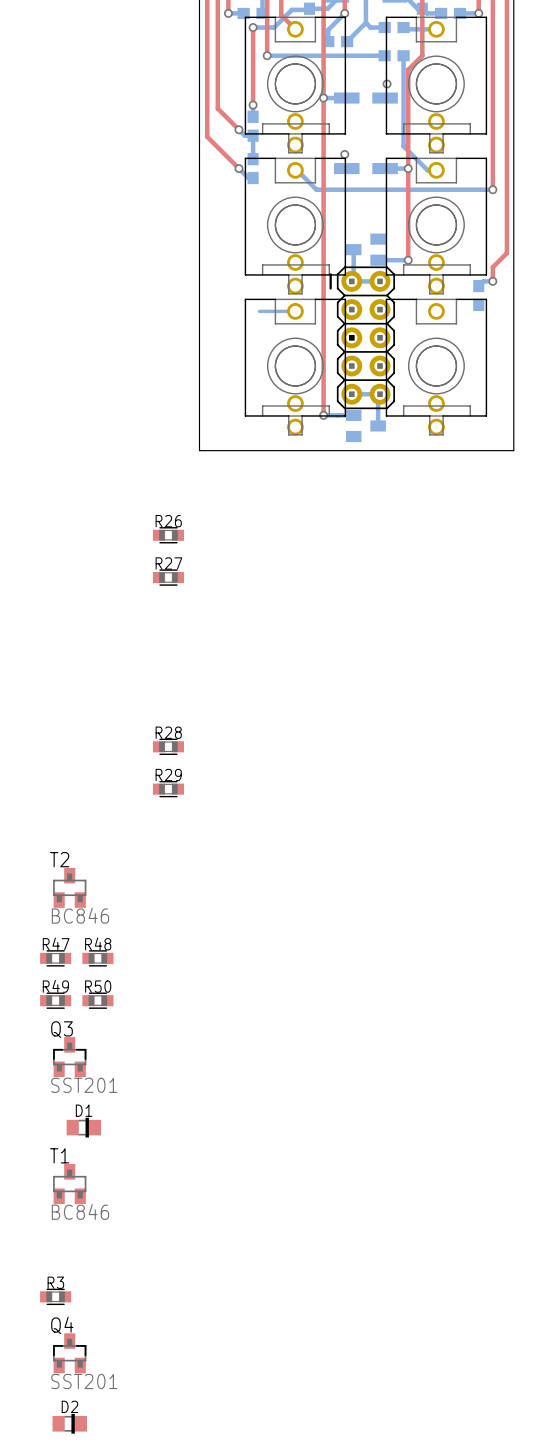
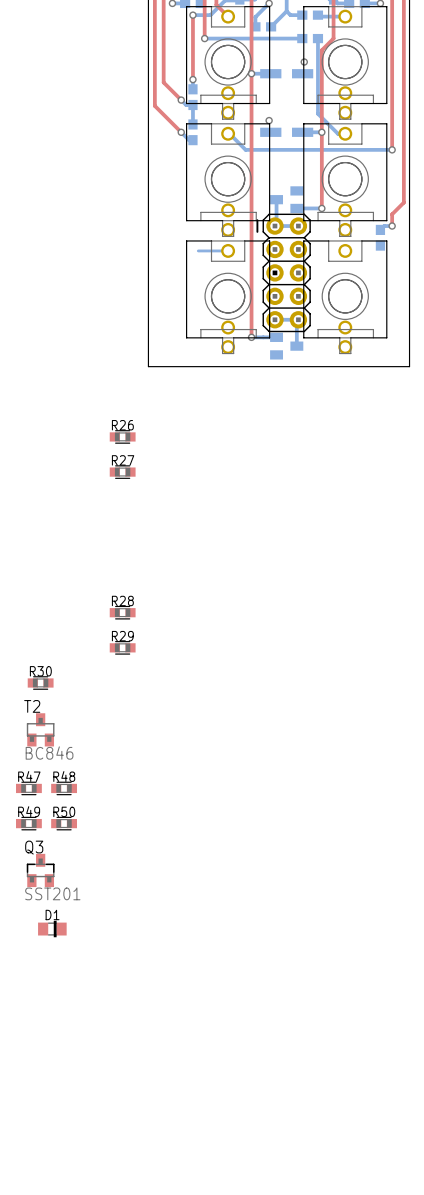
R30: none -> (40, 682)
T1: BC846 (69, 1184) -> none
R3: (55, 1296) -> none
Q4: SST201 (69, 1353) -> none
D2: (69, 1423) -> none

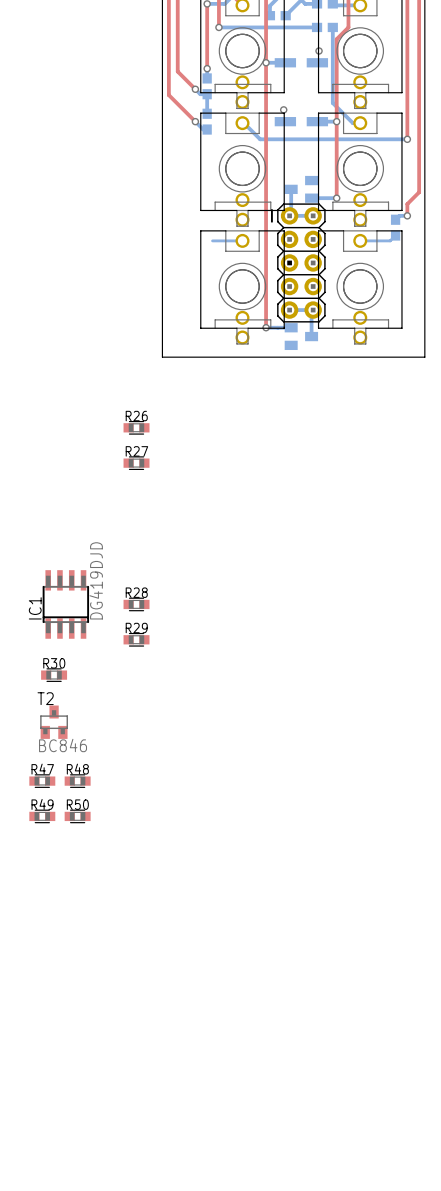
bottom track: none -> (395, 235) (390, 240) (360, 240)
IC1: none -> DG419DJD (65, 604)
Q3: SST201 (40, 870) -> none
D1: (52, 929) -> none

